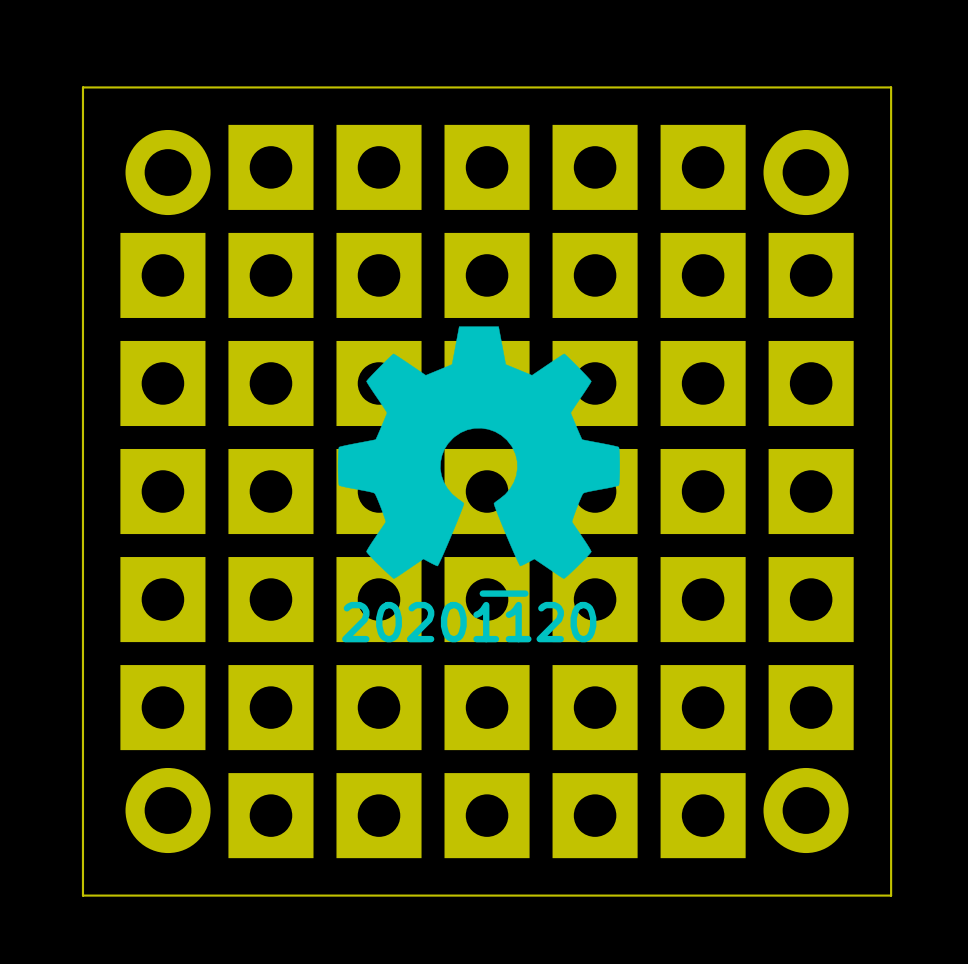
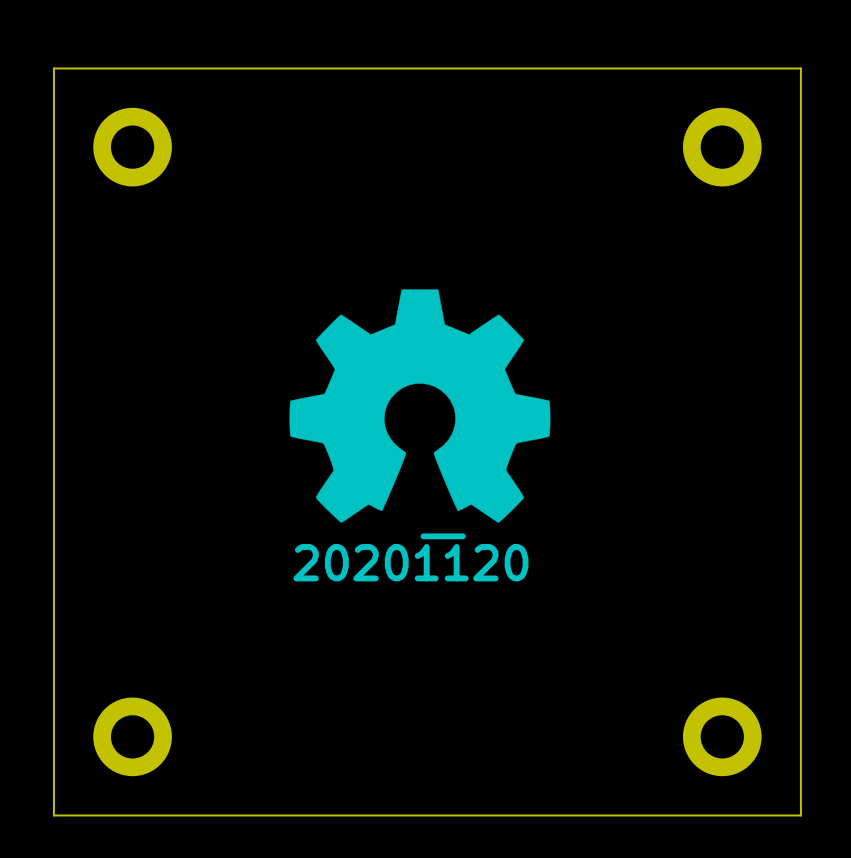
part: (487, 491) -> none

